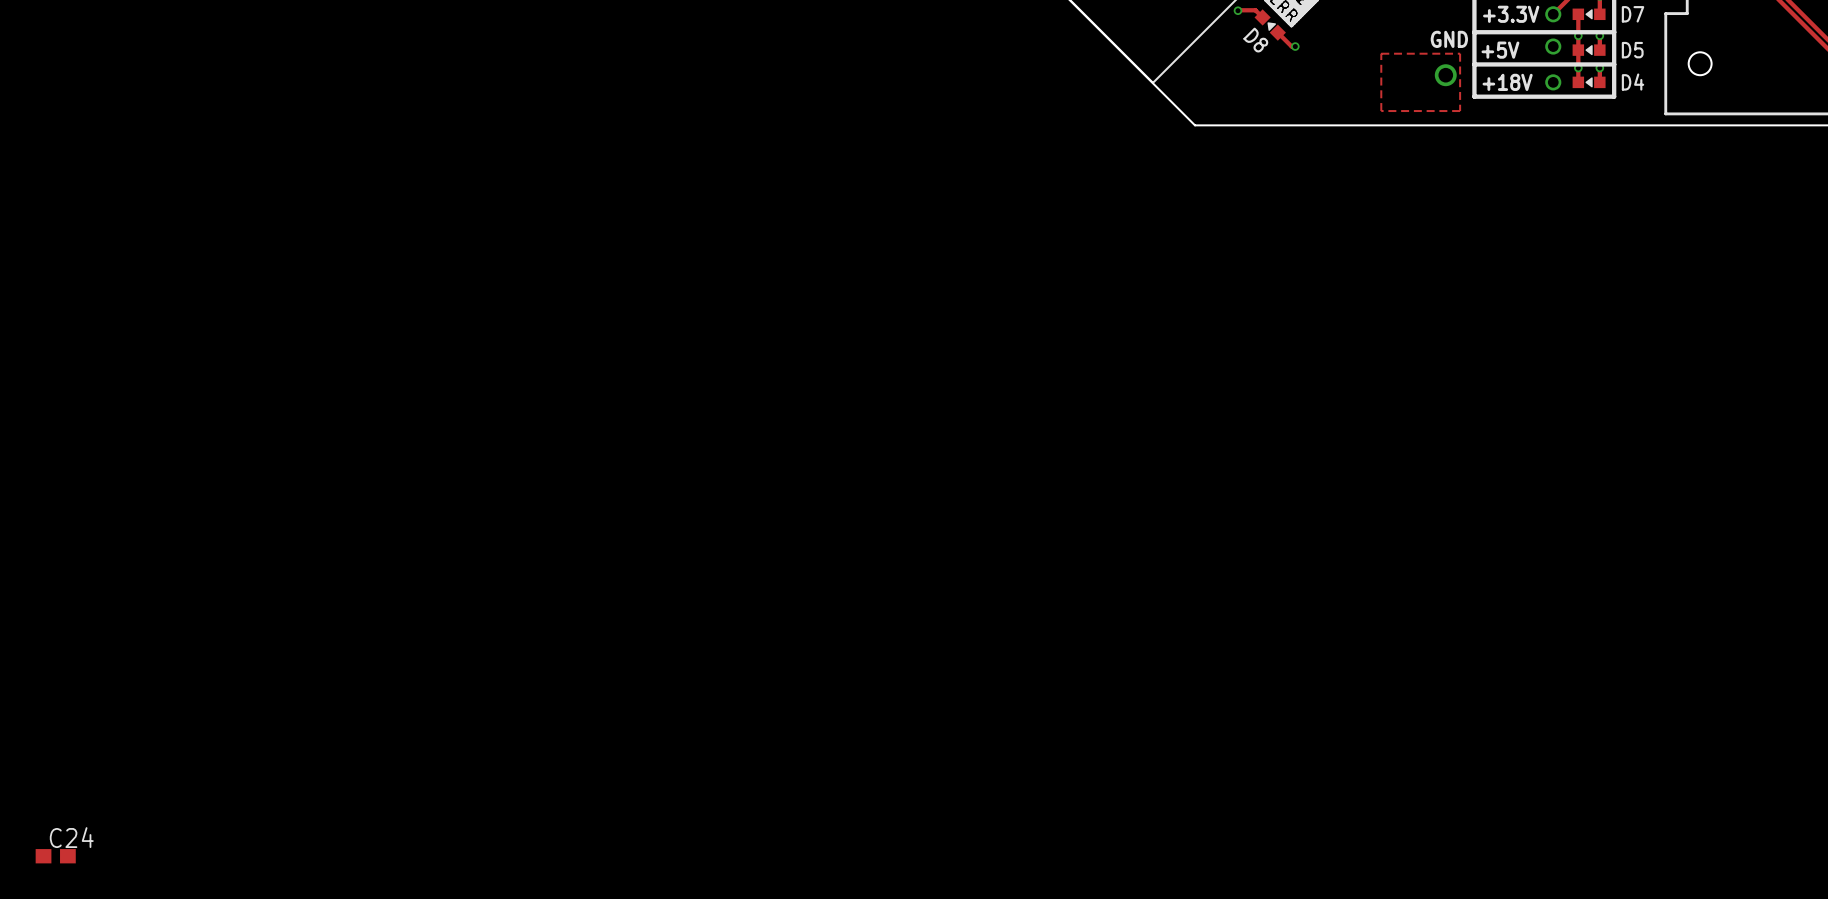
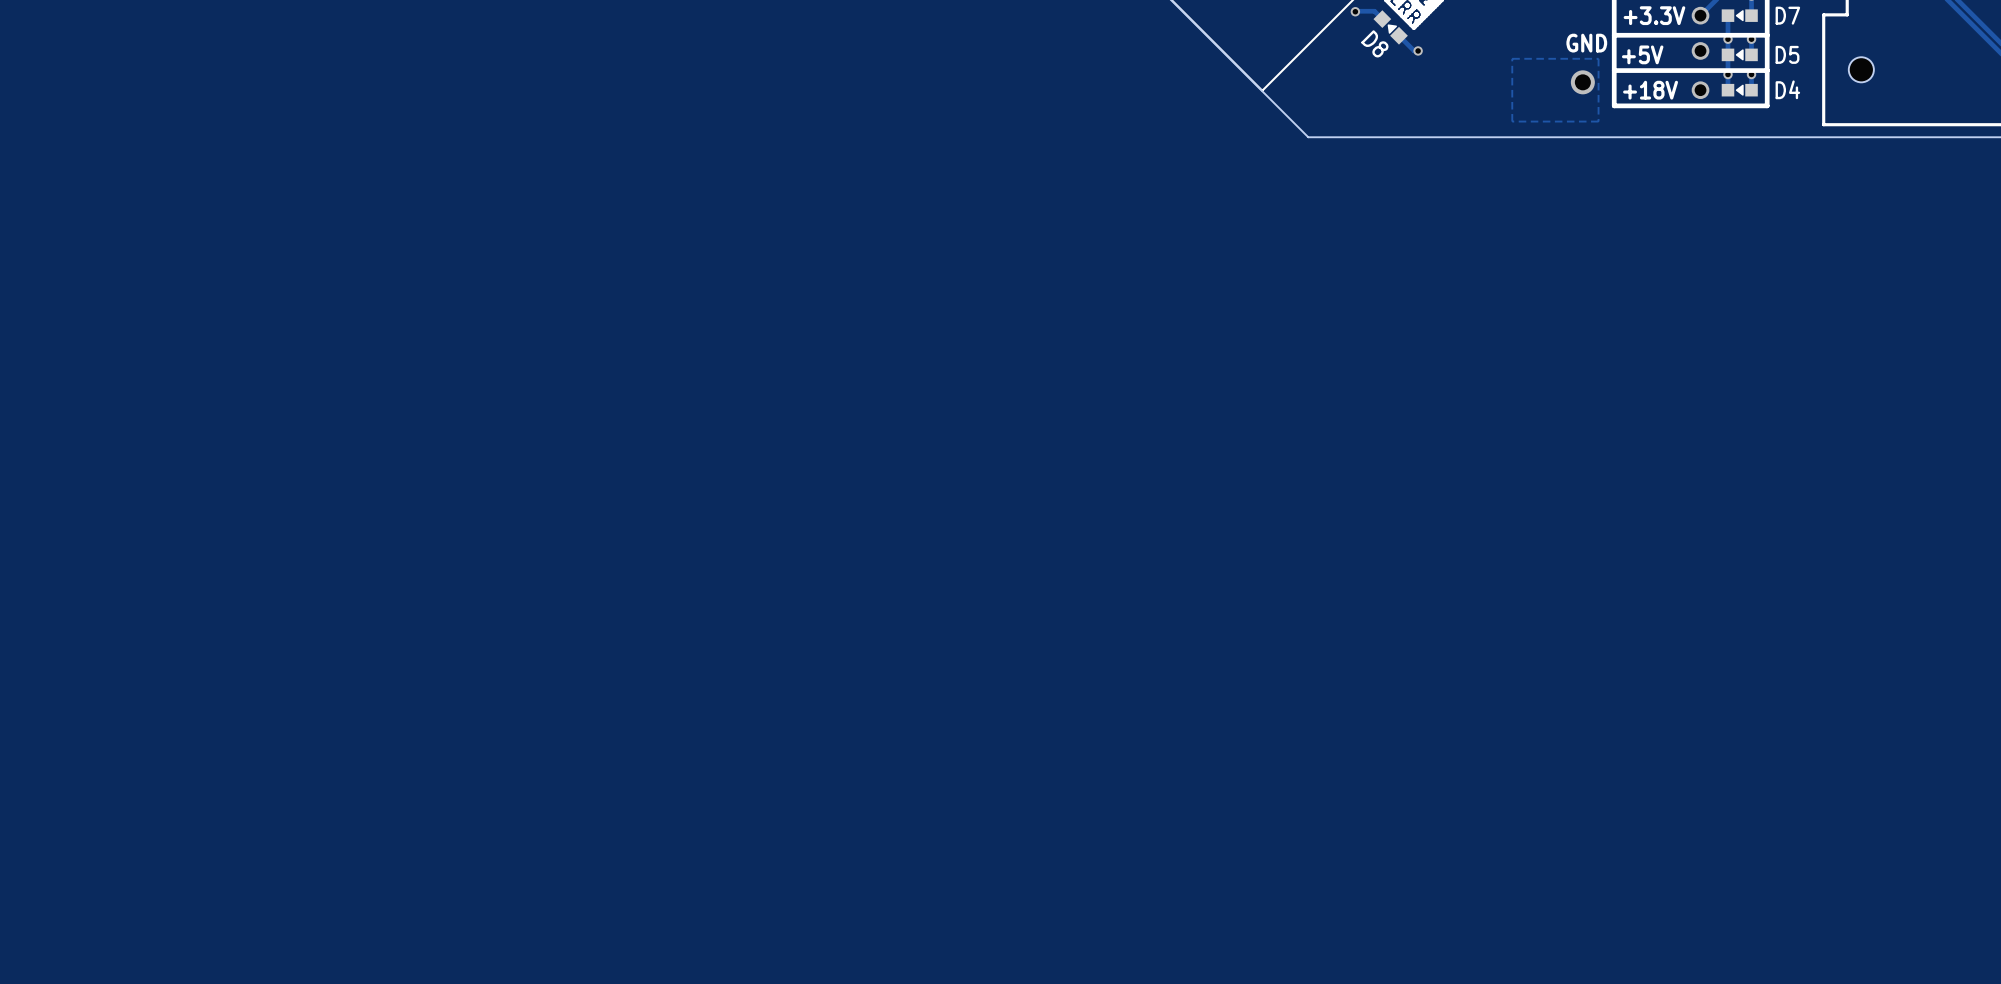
C24: (55, 856) -> none

